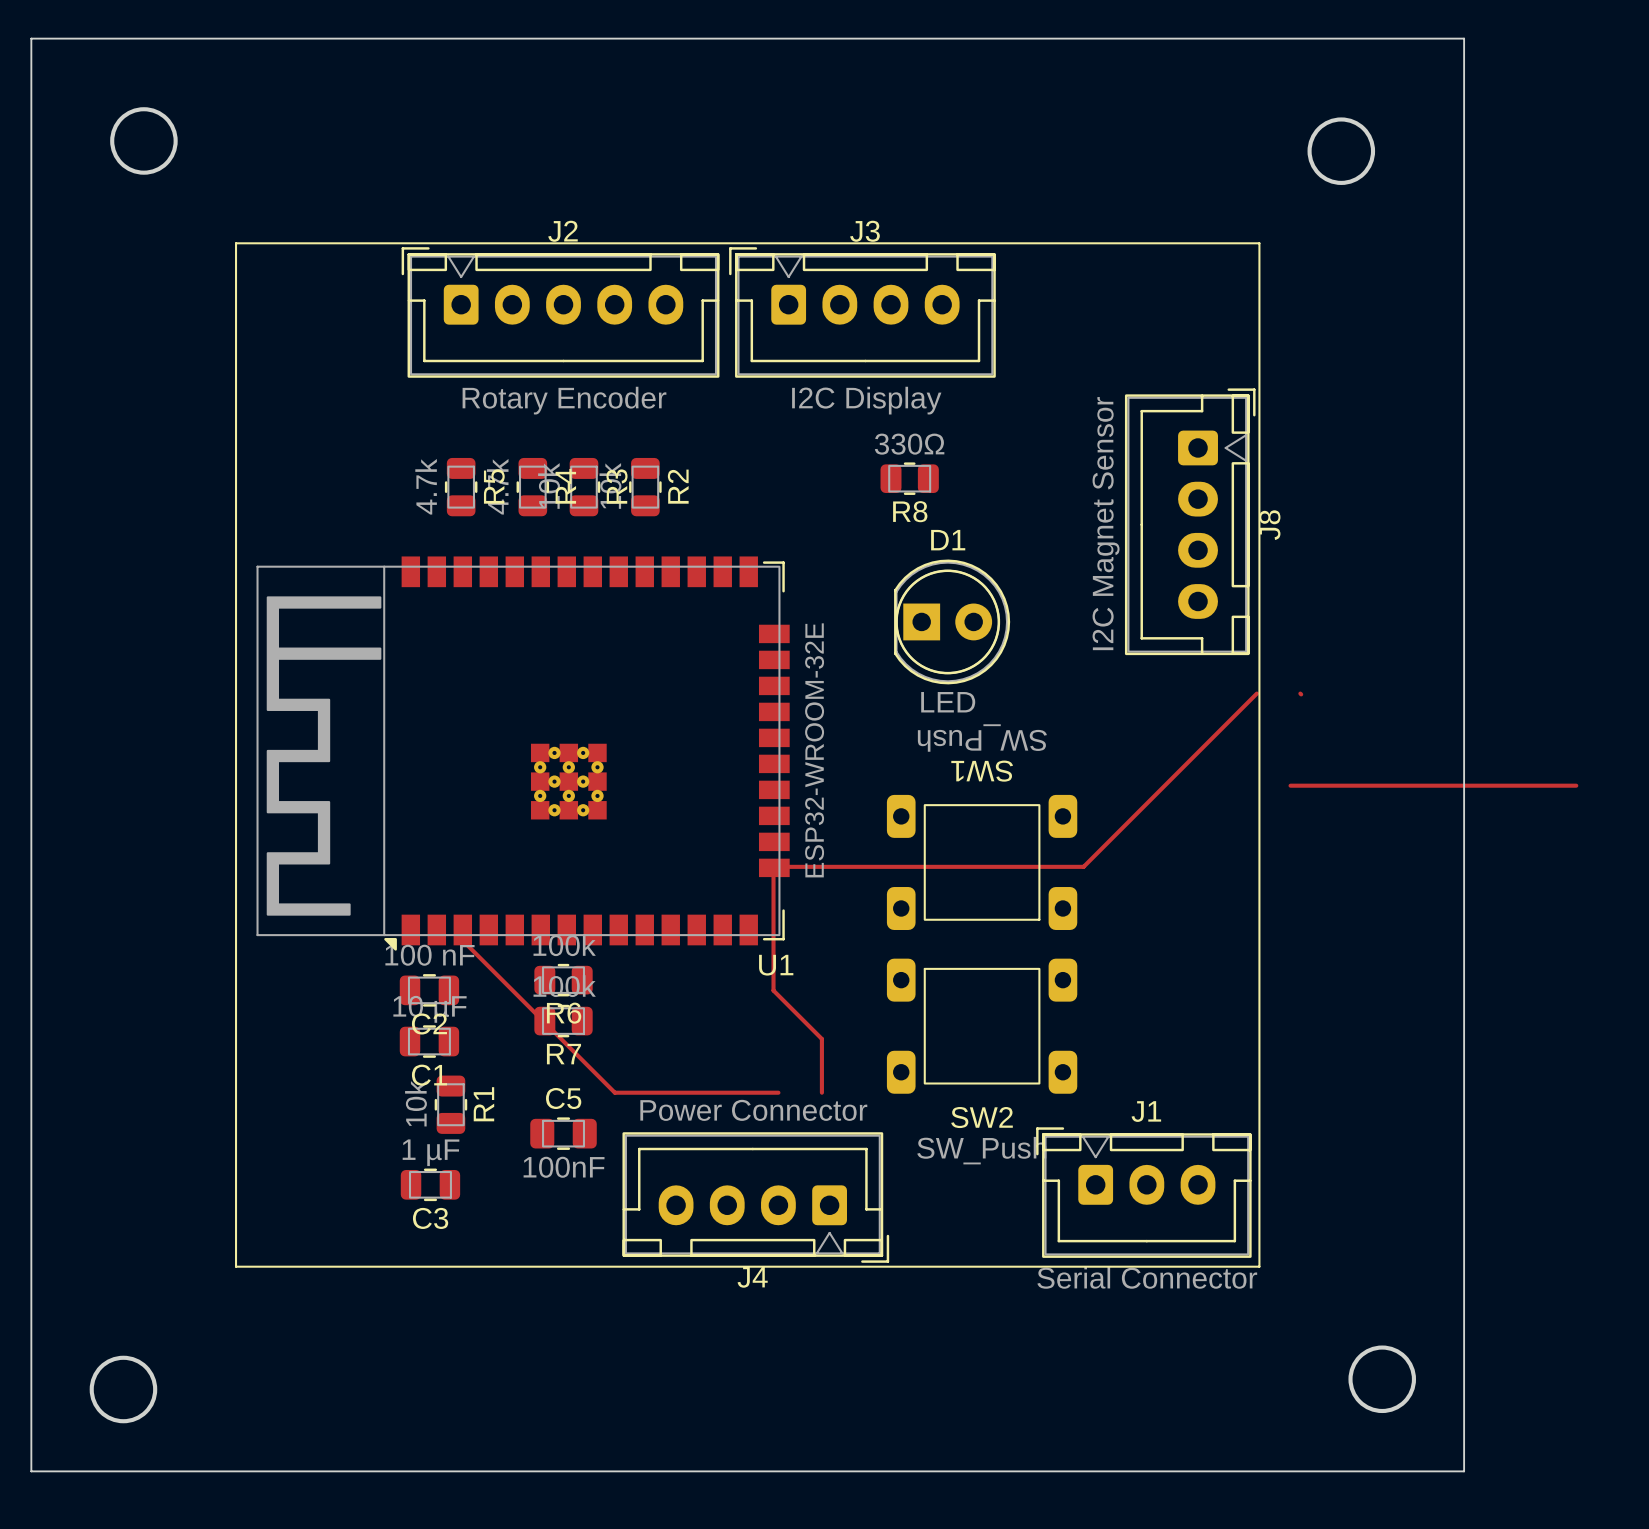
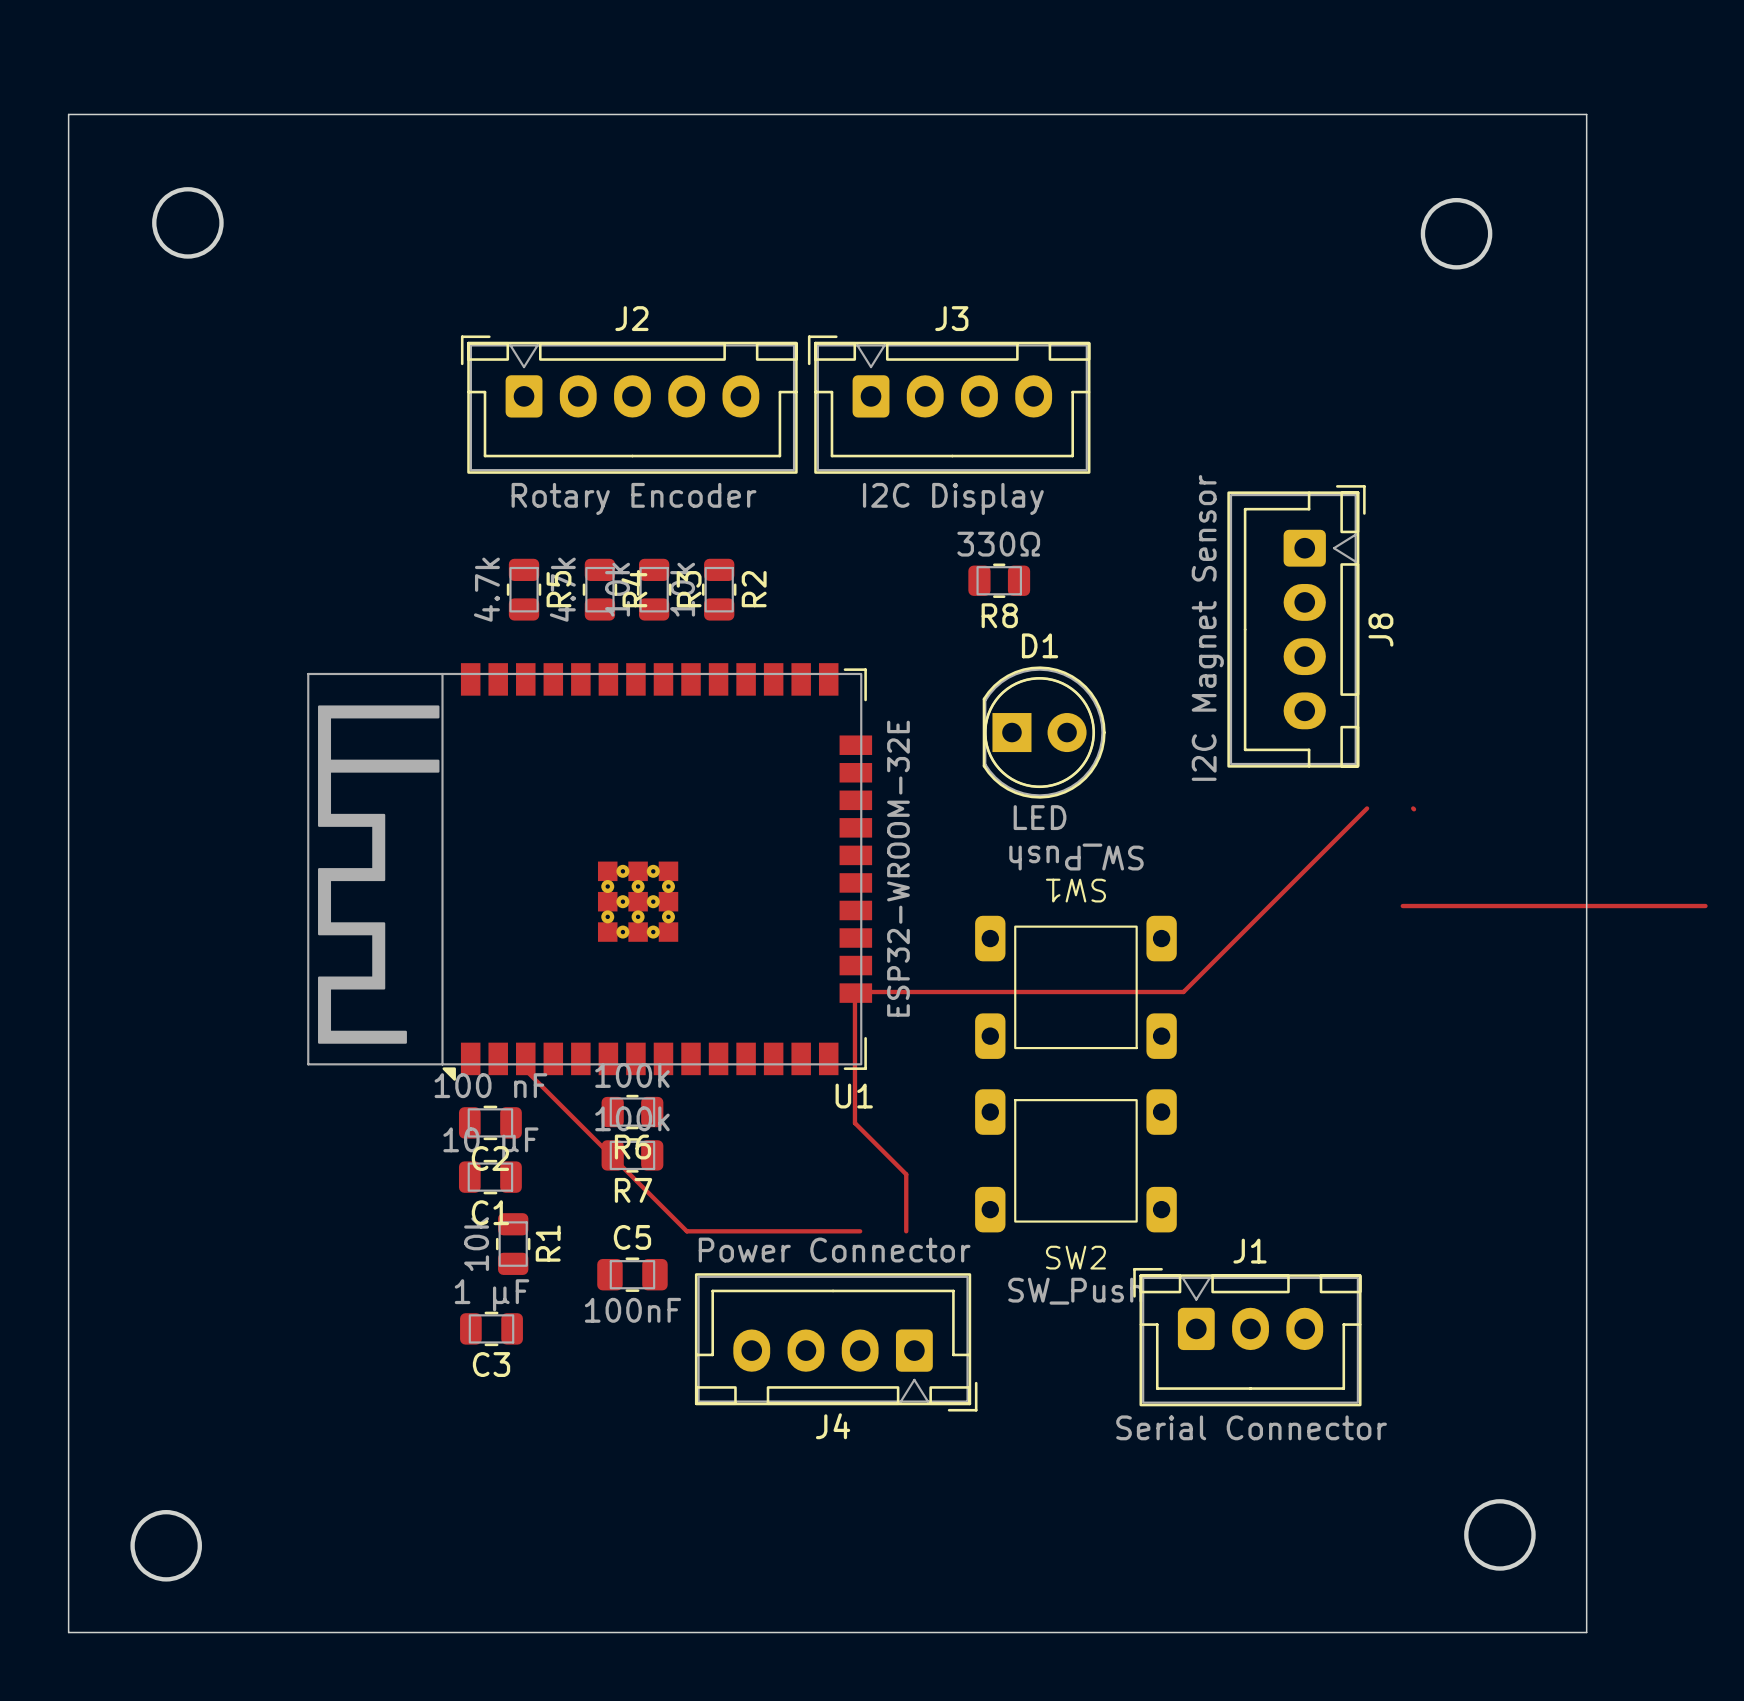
line: (236, 243) (1259, 243) (1259, 1266) (236, 1266) (236, 243) -> none

